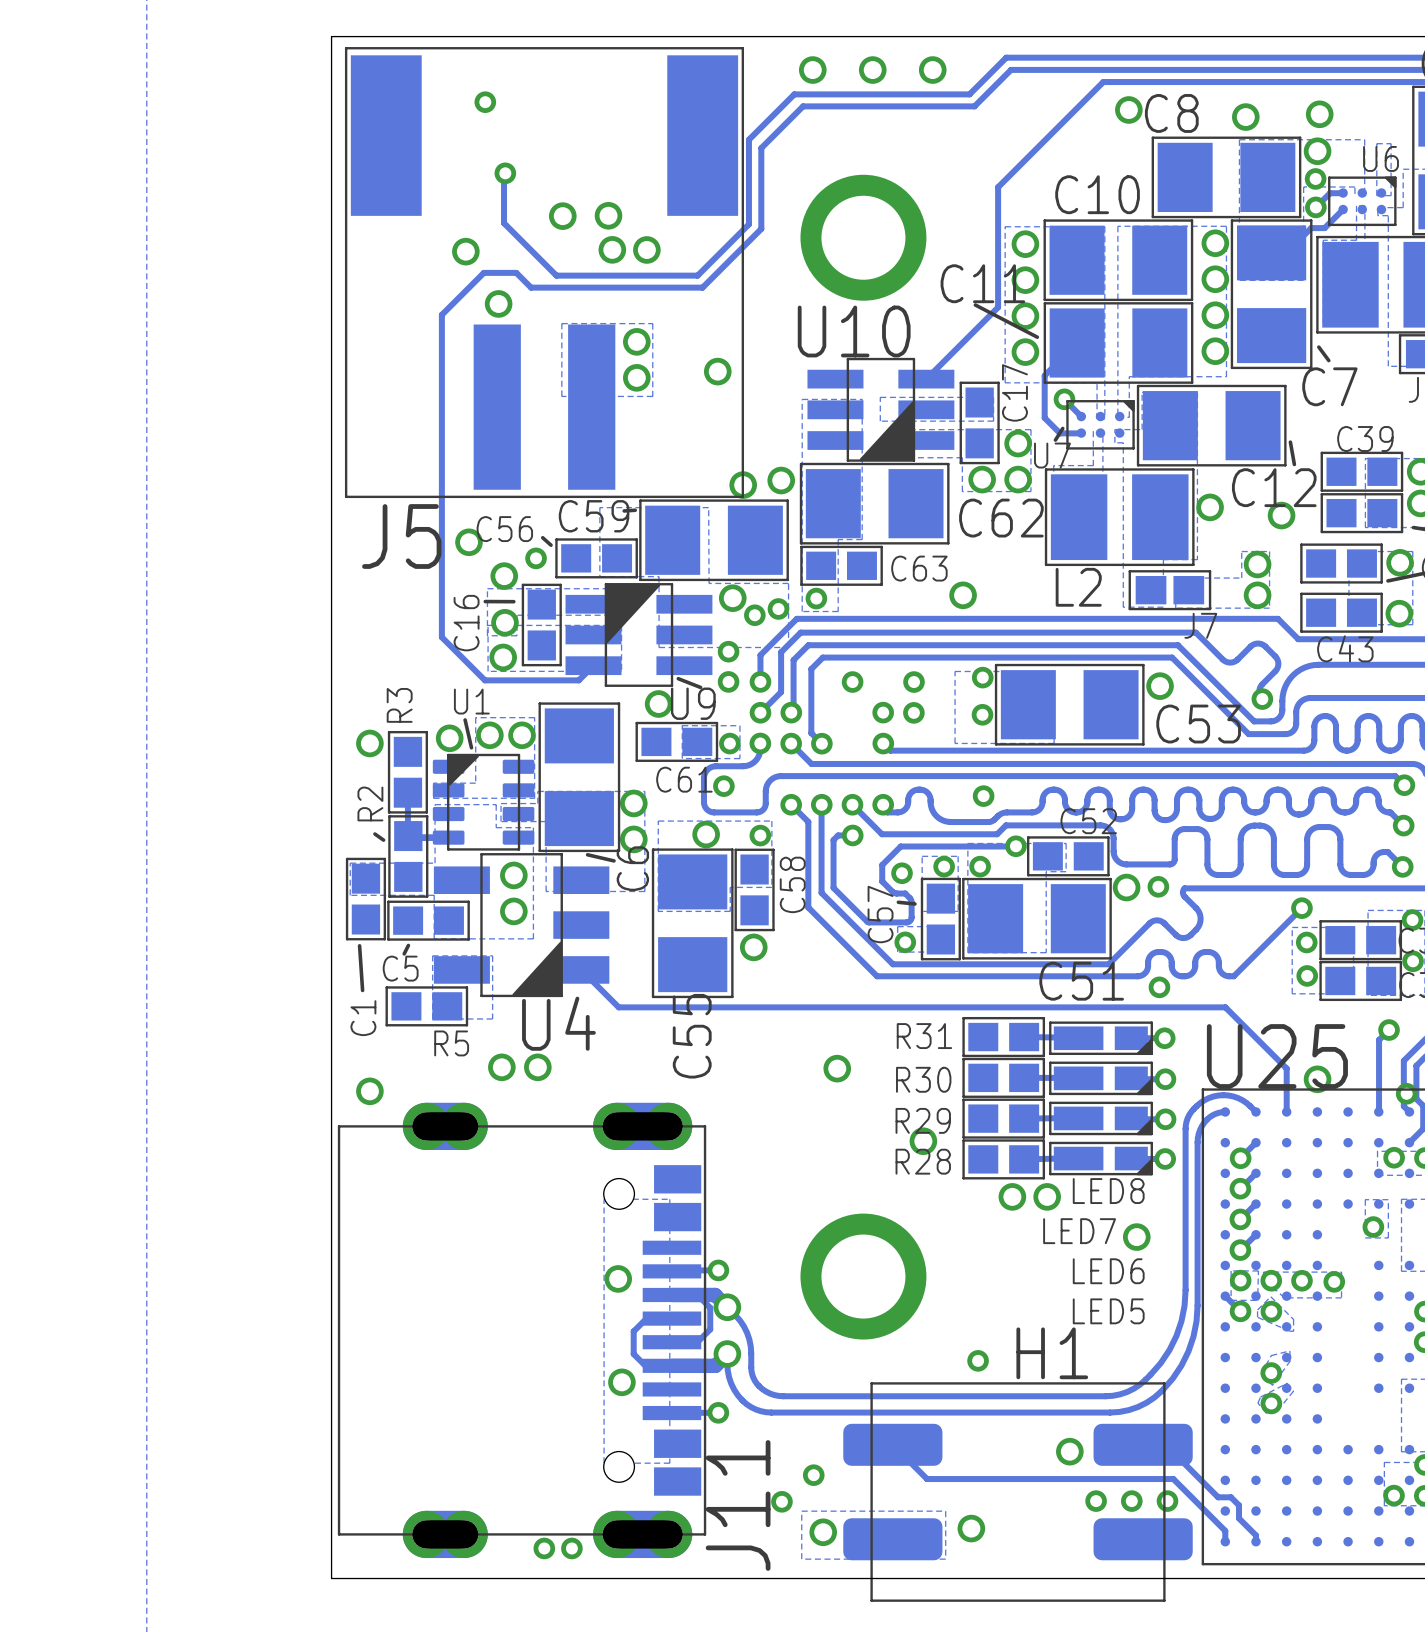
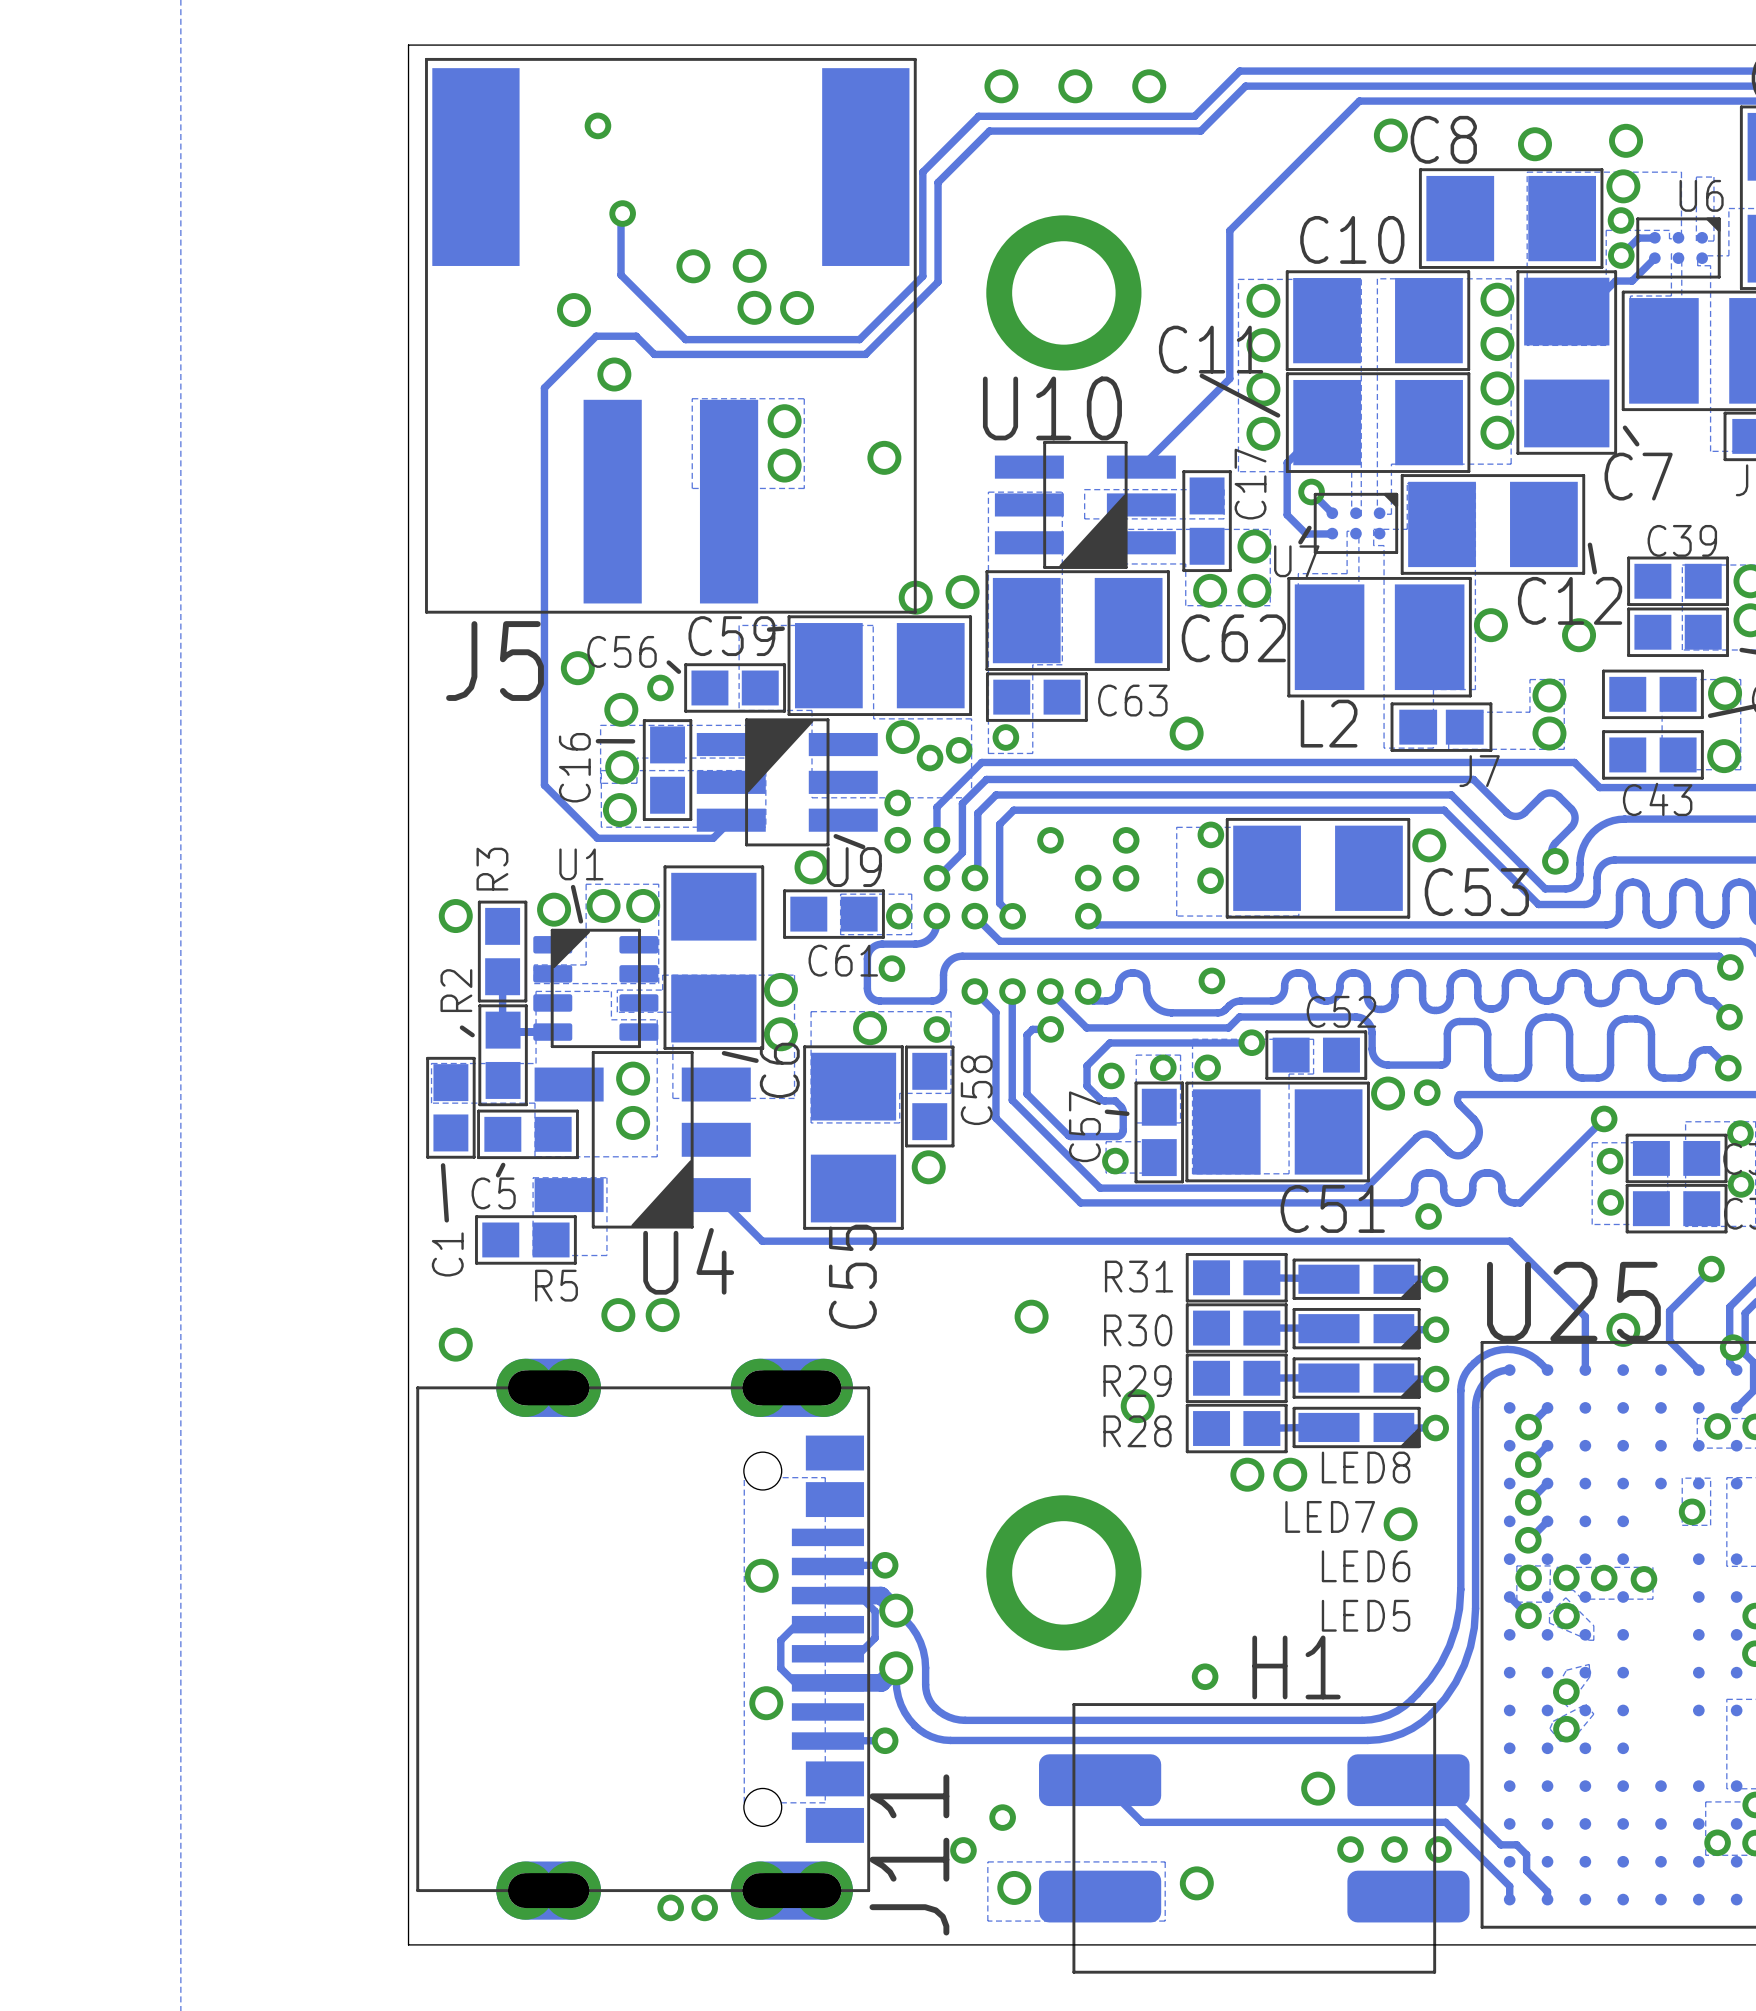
track: (1379, 1040) (1379, 1111) -> (1699, 1281) (1669, 1311) (1669, 1340) (1698, 1370)

